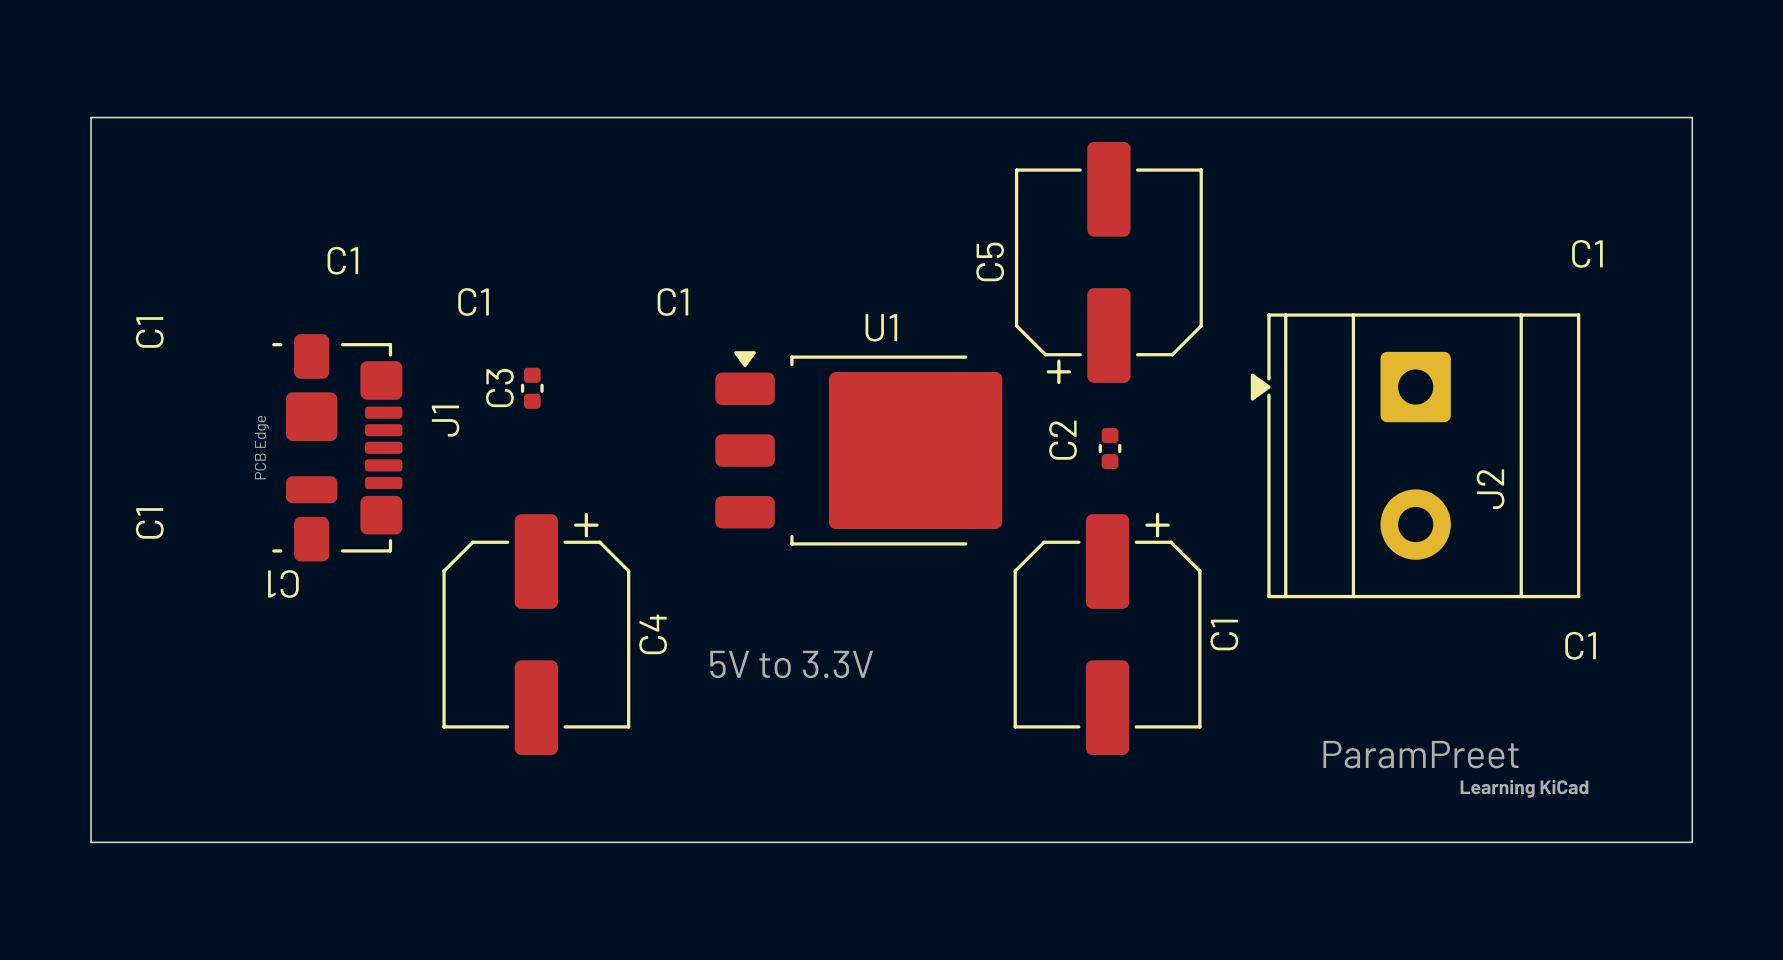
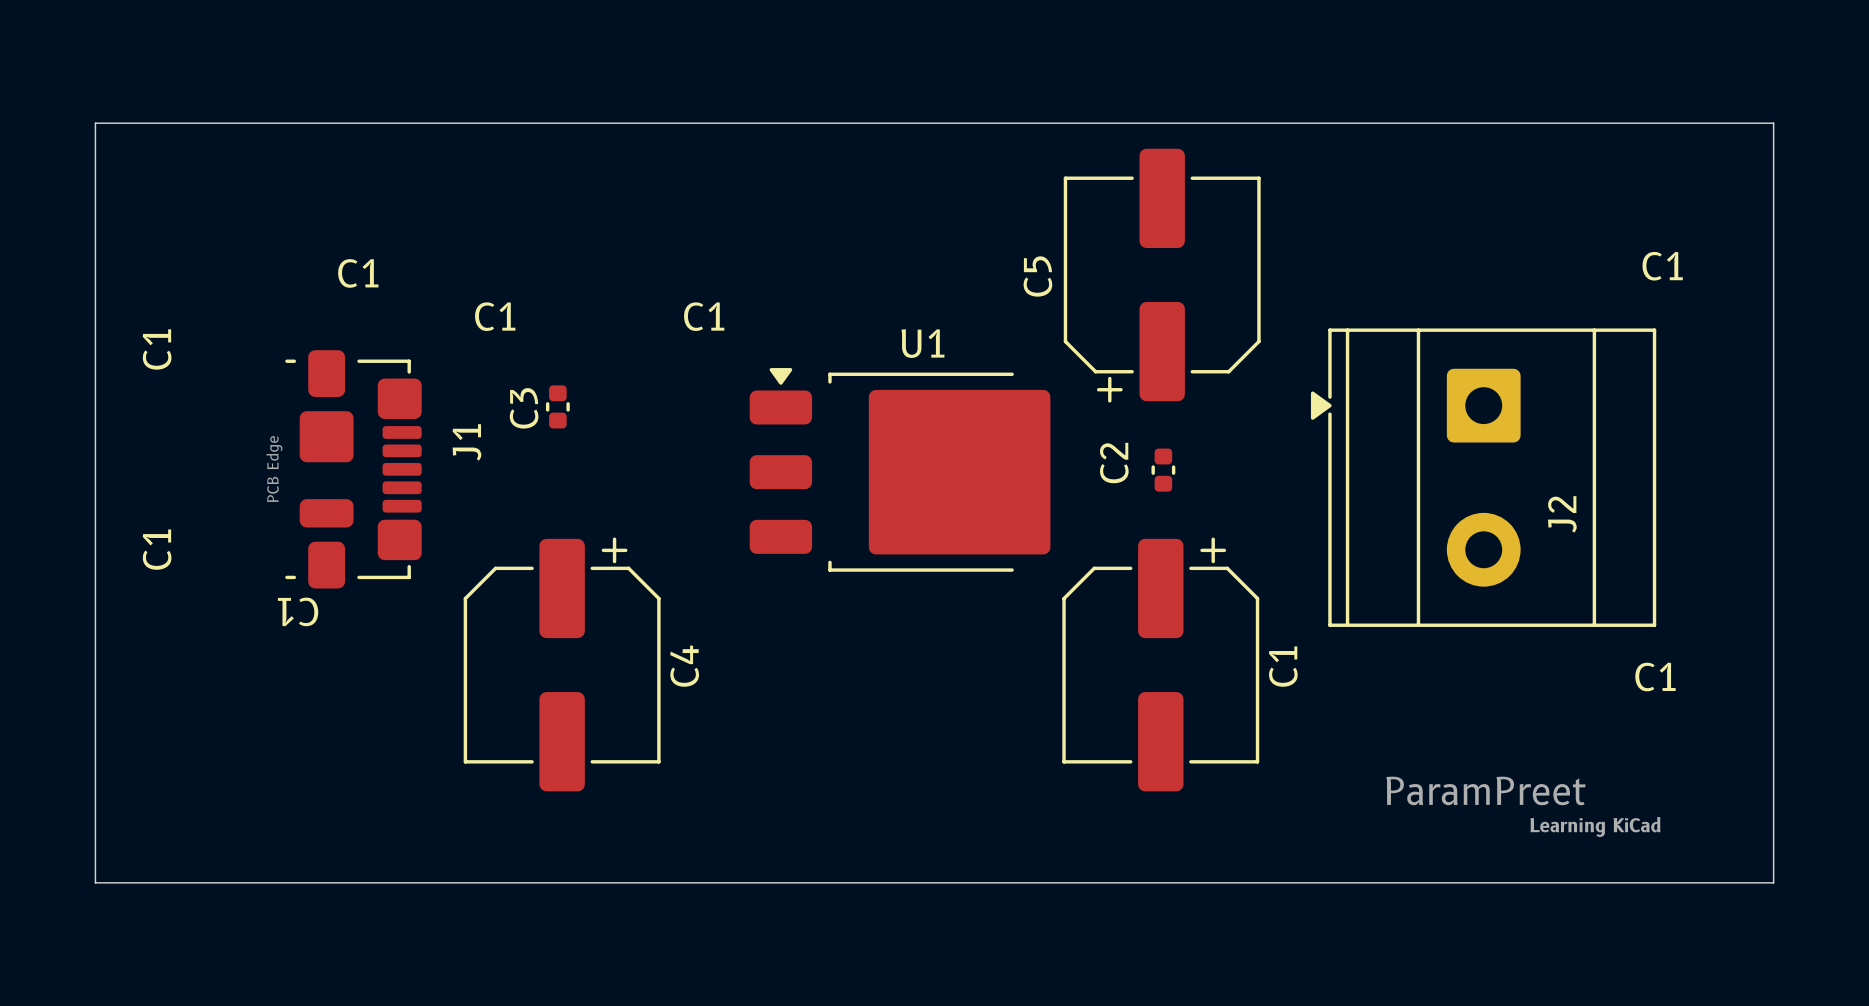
text: 5V to 3.3V (791, 664) -> none

